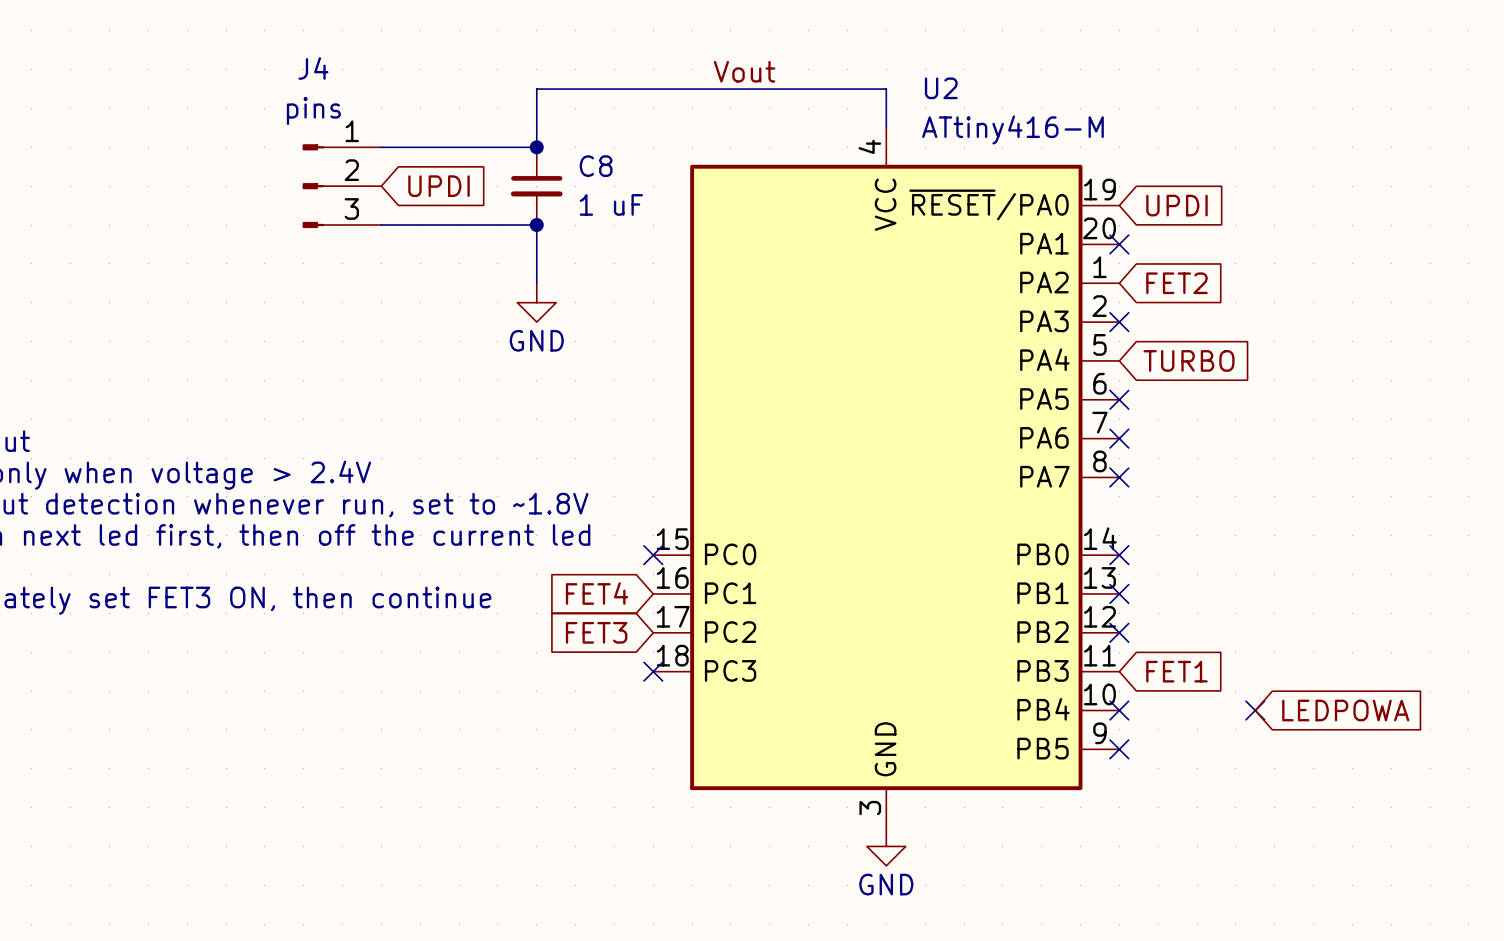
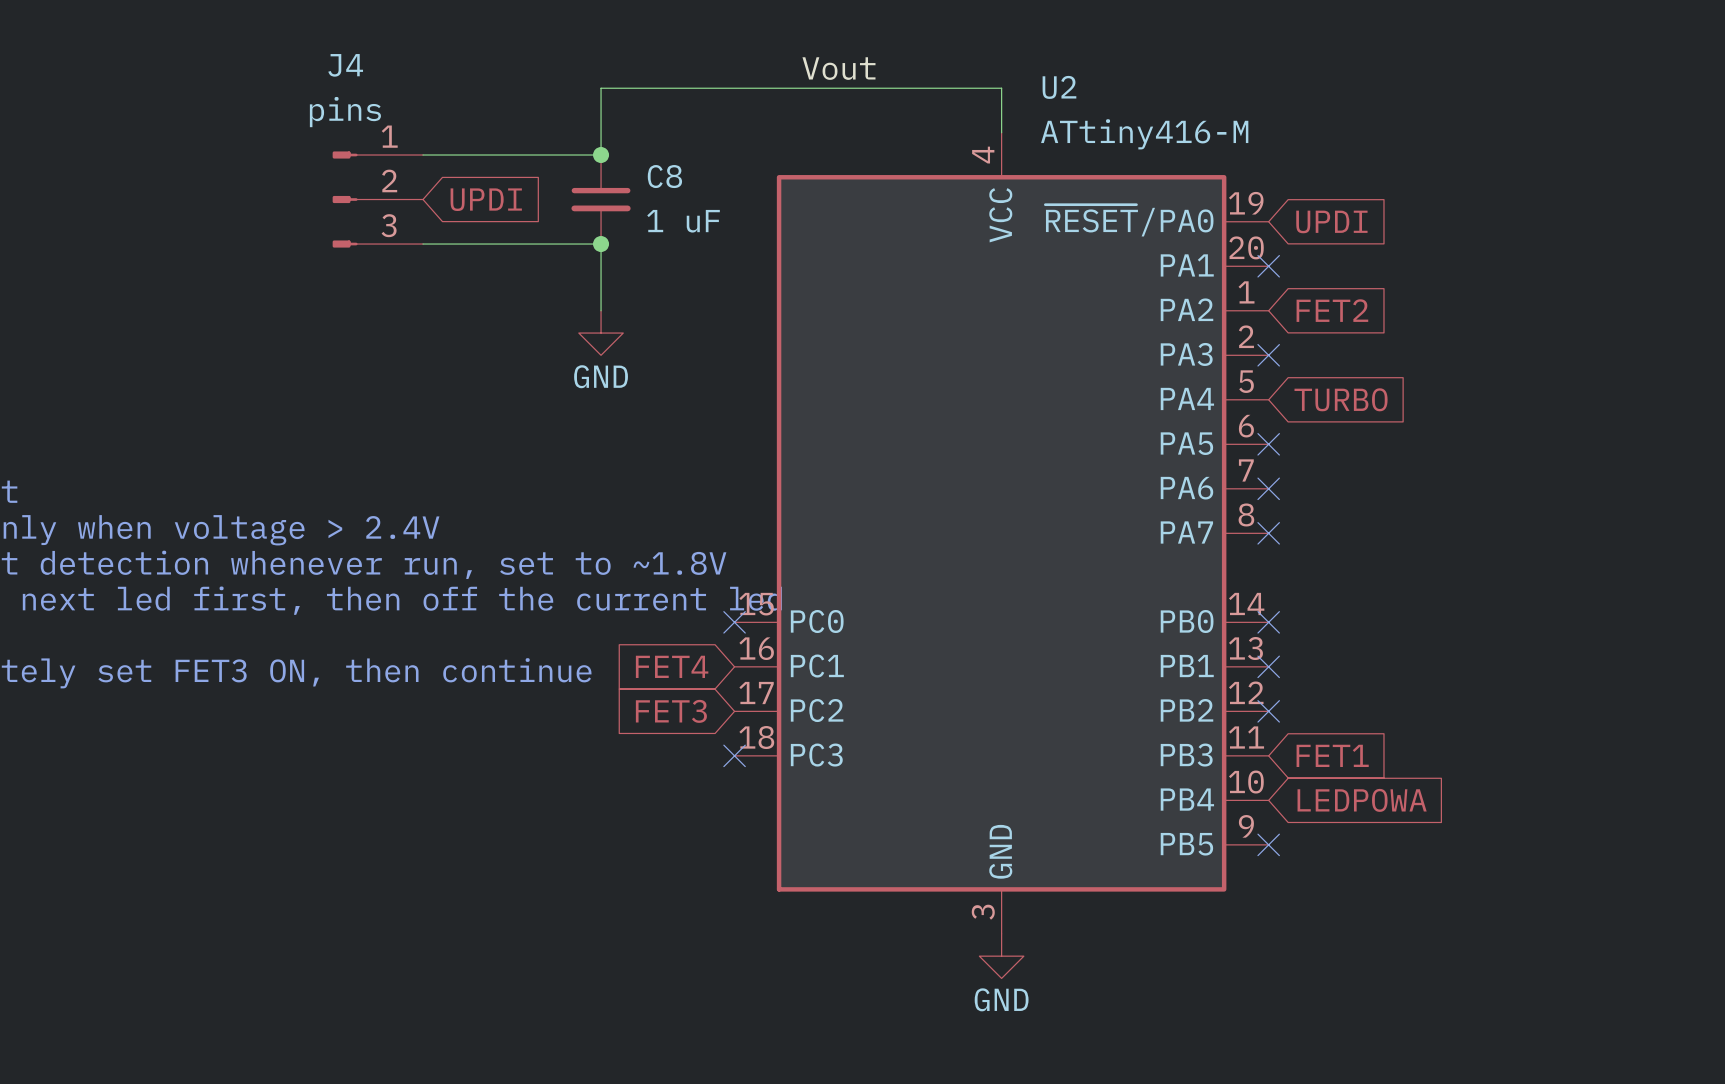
no-connect mark: (1119, 710) -> none
no-connect mark: (1255, 710) -> none
global label position: LEDPOWA (1345, 710) -> LEDPOWA (1362, 800)

